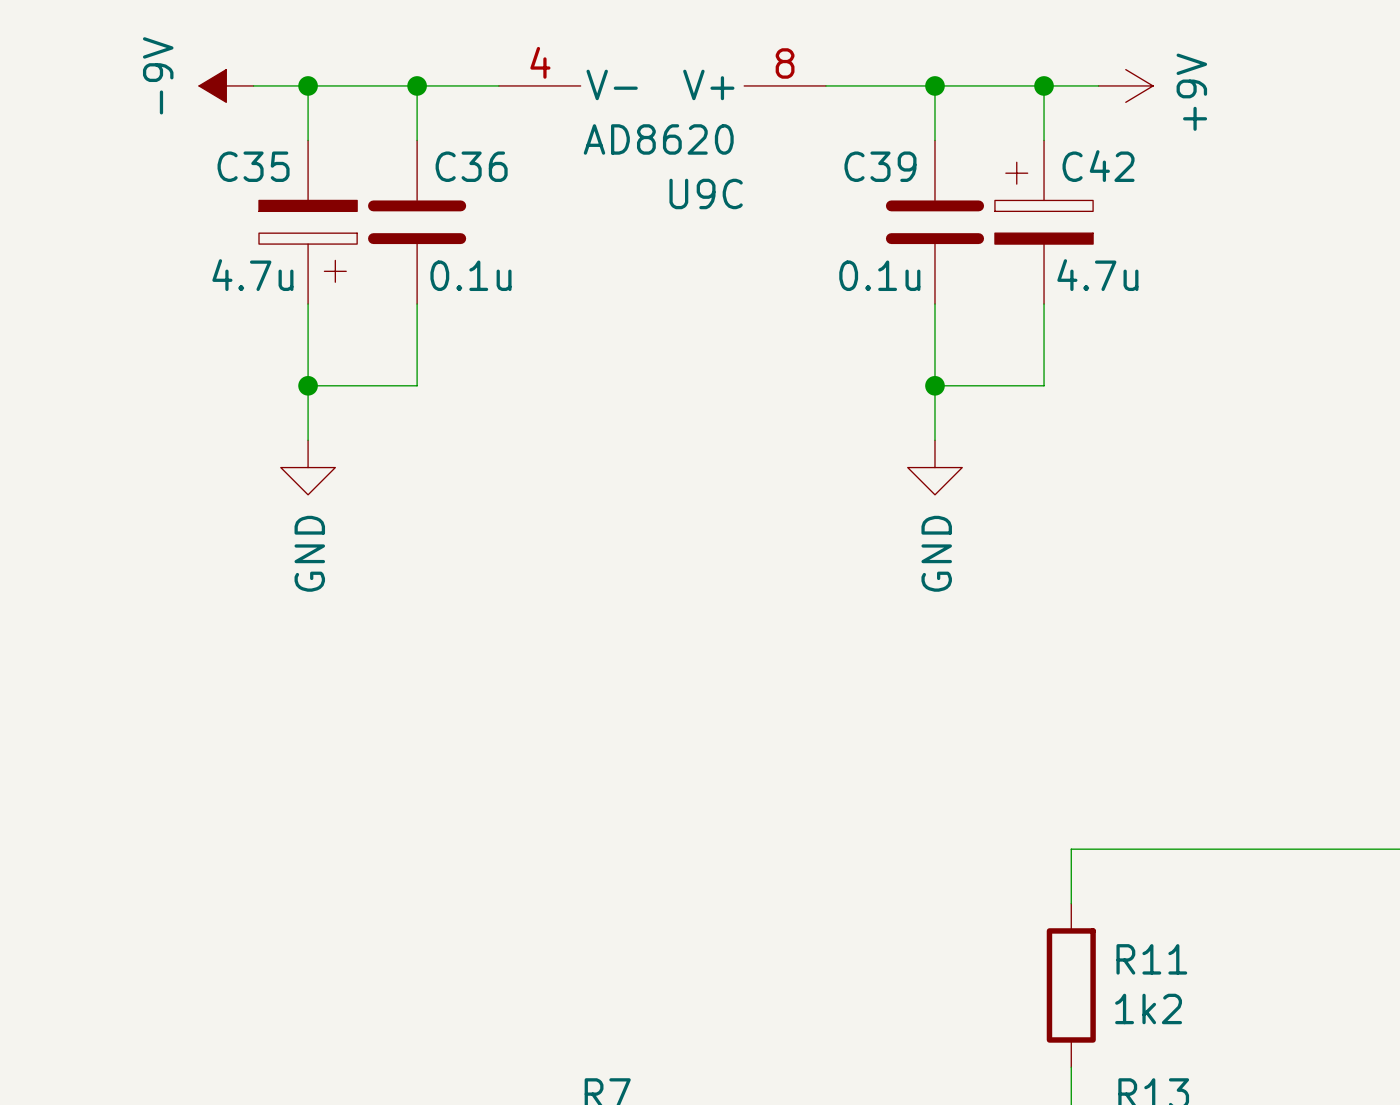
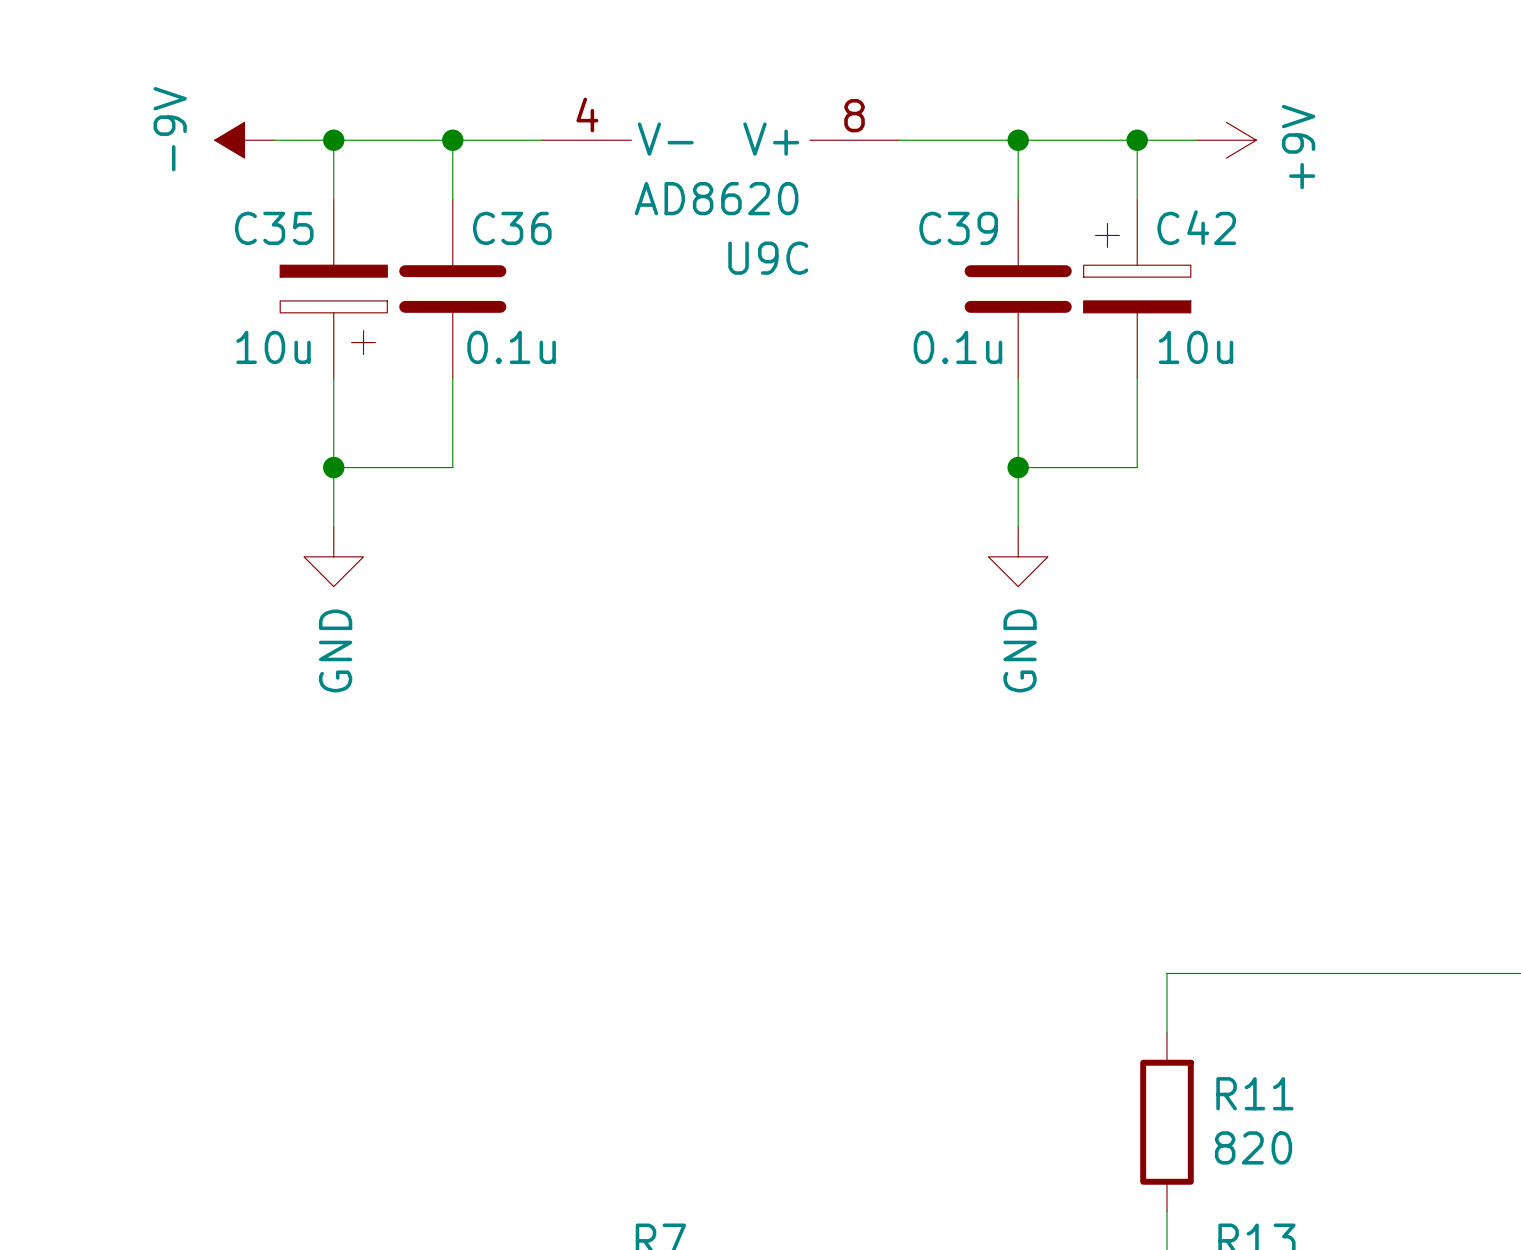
C35 value: 4.7u (252, 275) -> 10u (273, 347)
C42 value: 4.7u (1097, 275) -> 10u (1196, 347)
R11 value: 1k2 (1148, 1008) -> 820 (1253, 1147)

